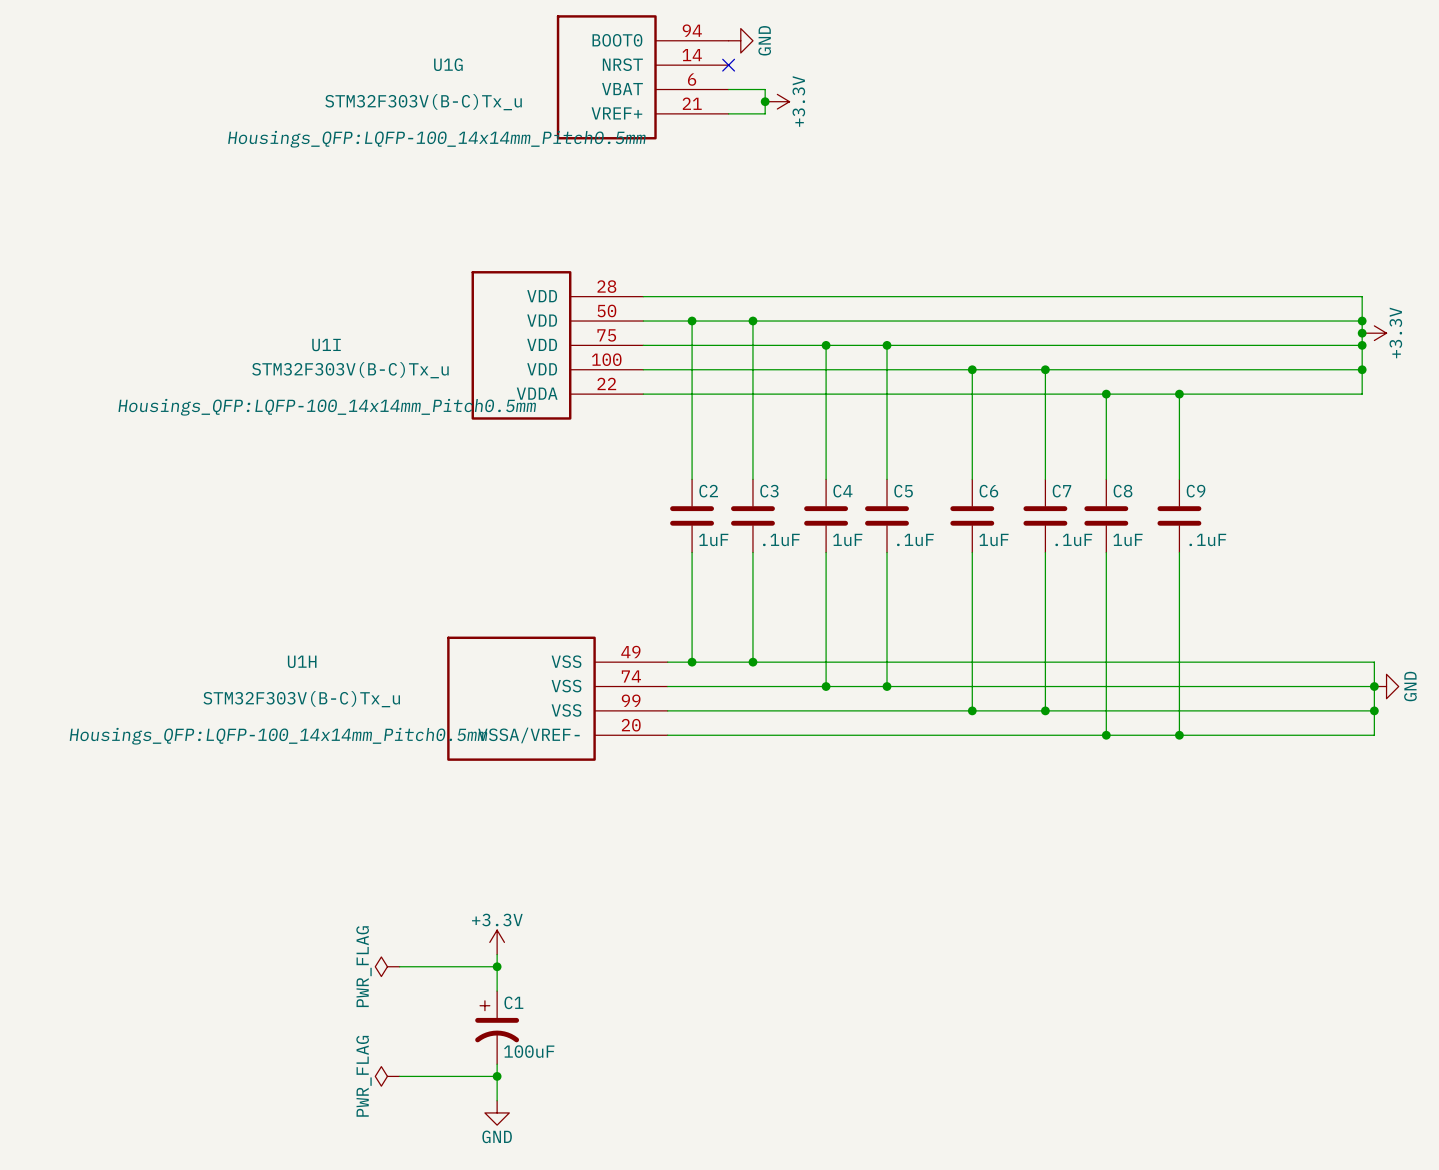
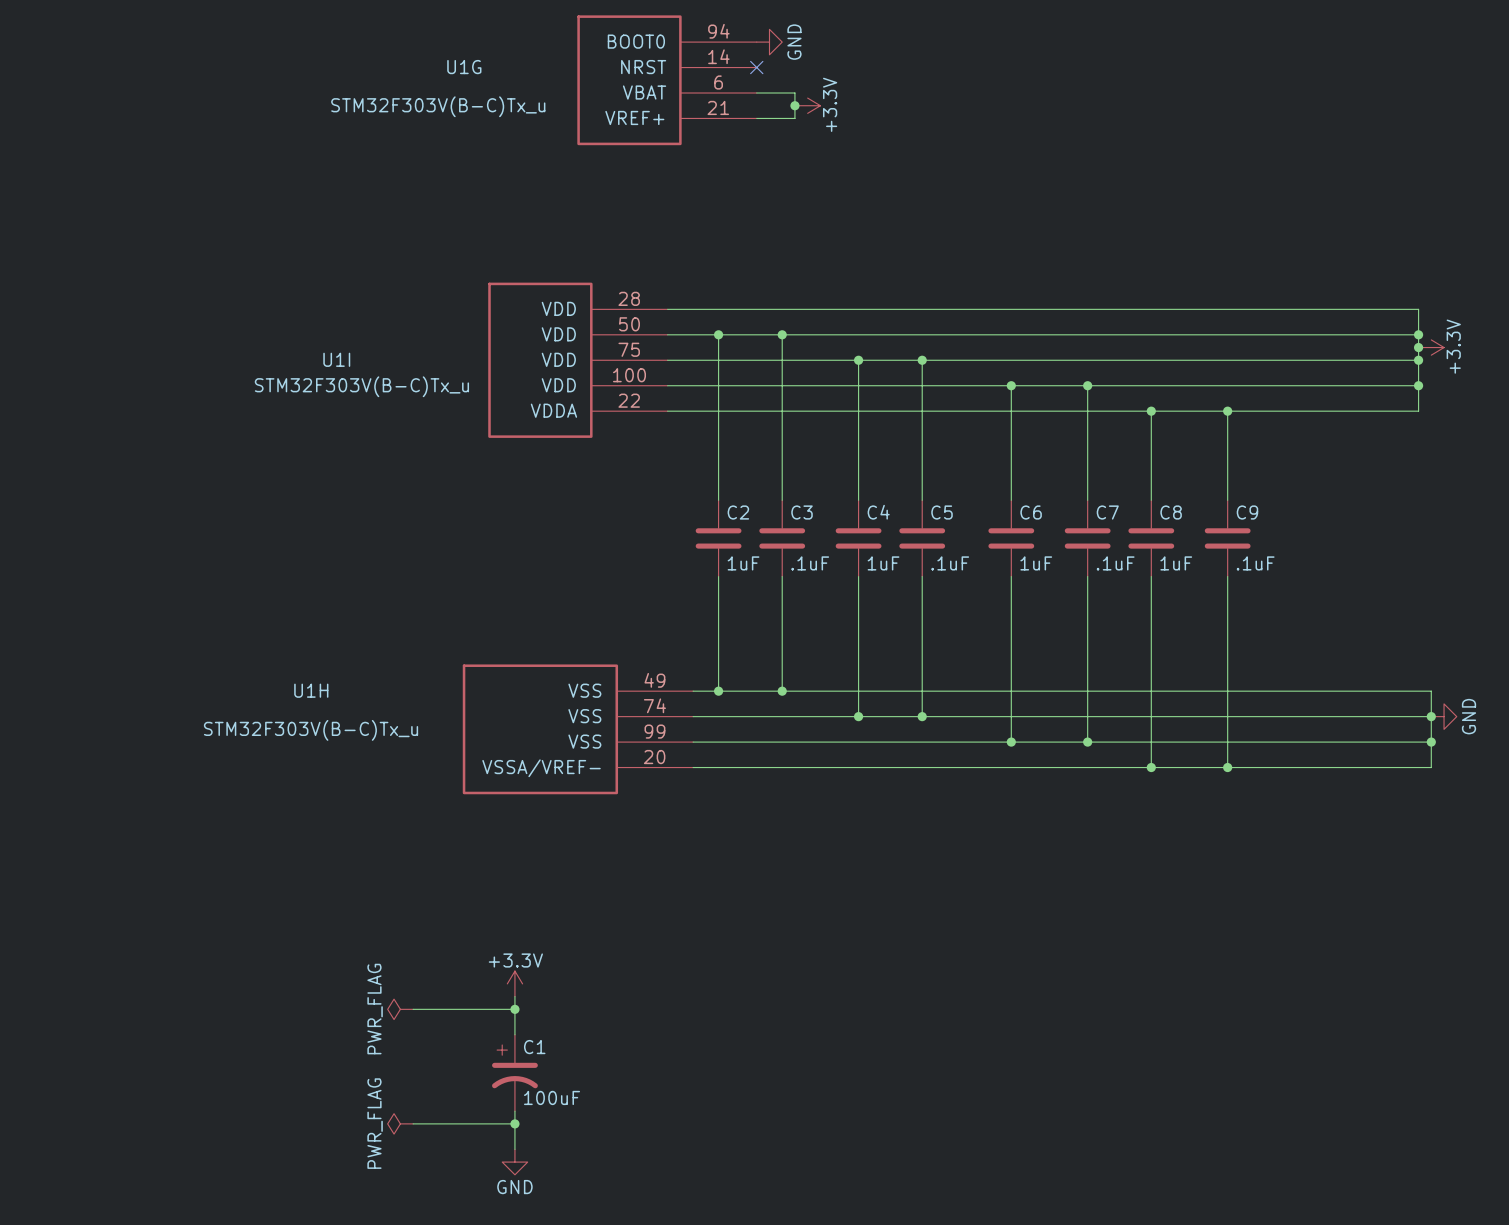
U1G text: Housings_QFP:LQFP-100_14x14mm_Pitch0.5mm (436, 139) -> none
U1I text: Housings_QFP:LQFP-100_14x14mm_Pitch0.5mm (327, 407) -> none
U1H text: Housings_QFP:LQFP-100_14x14mm_Pitch0.5mm (278, 736) -> none

